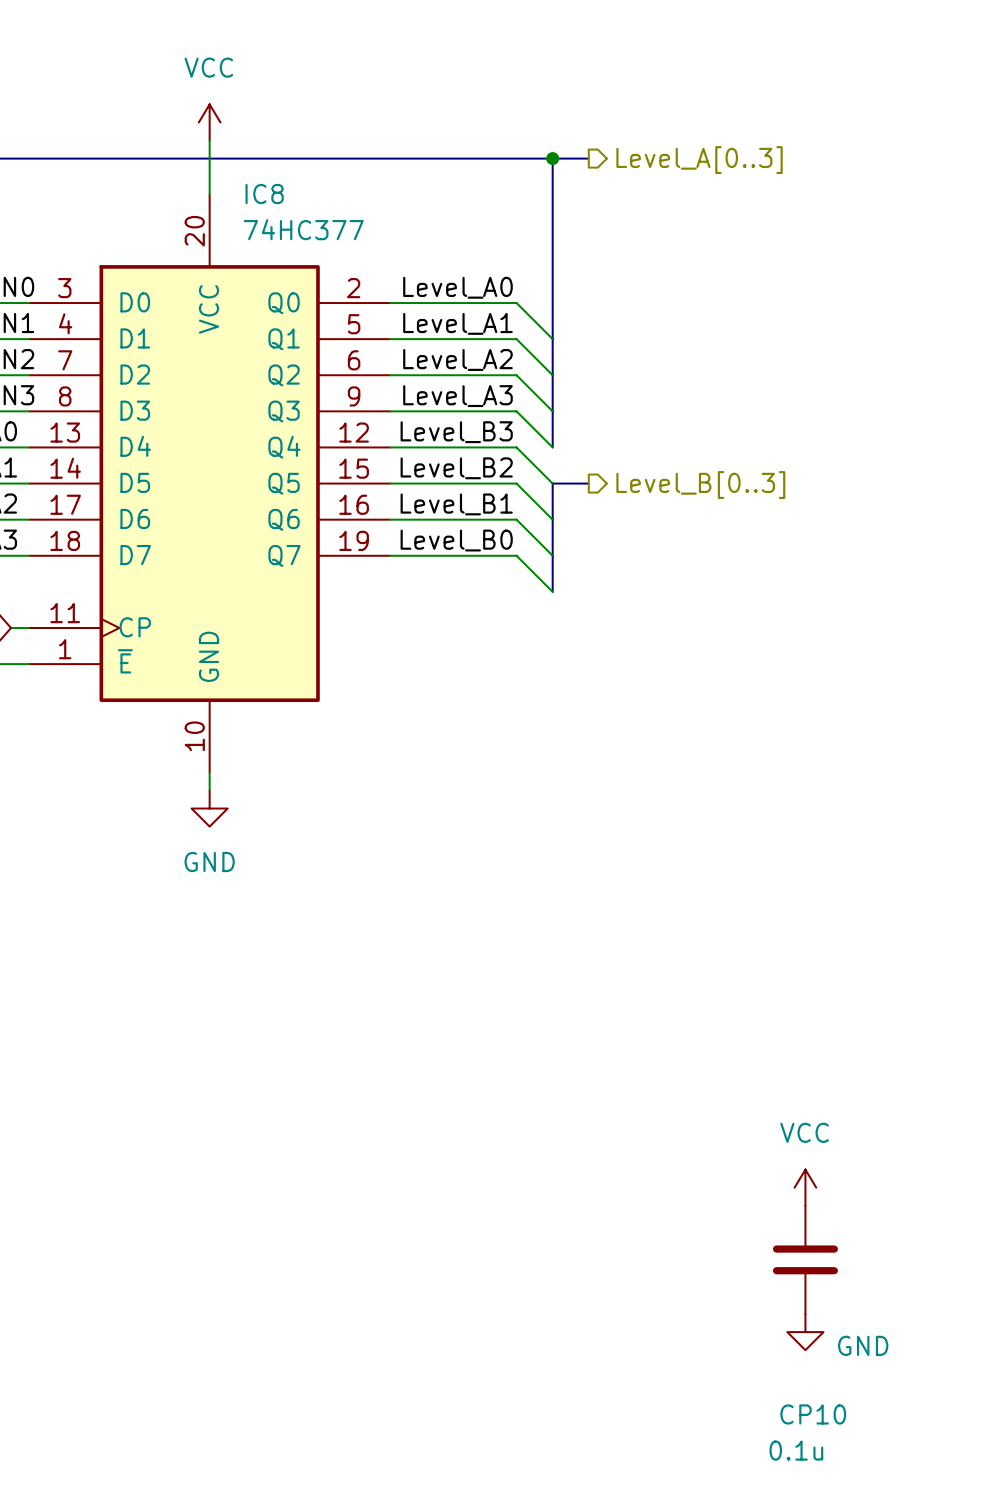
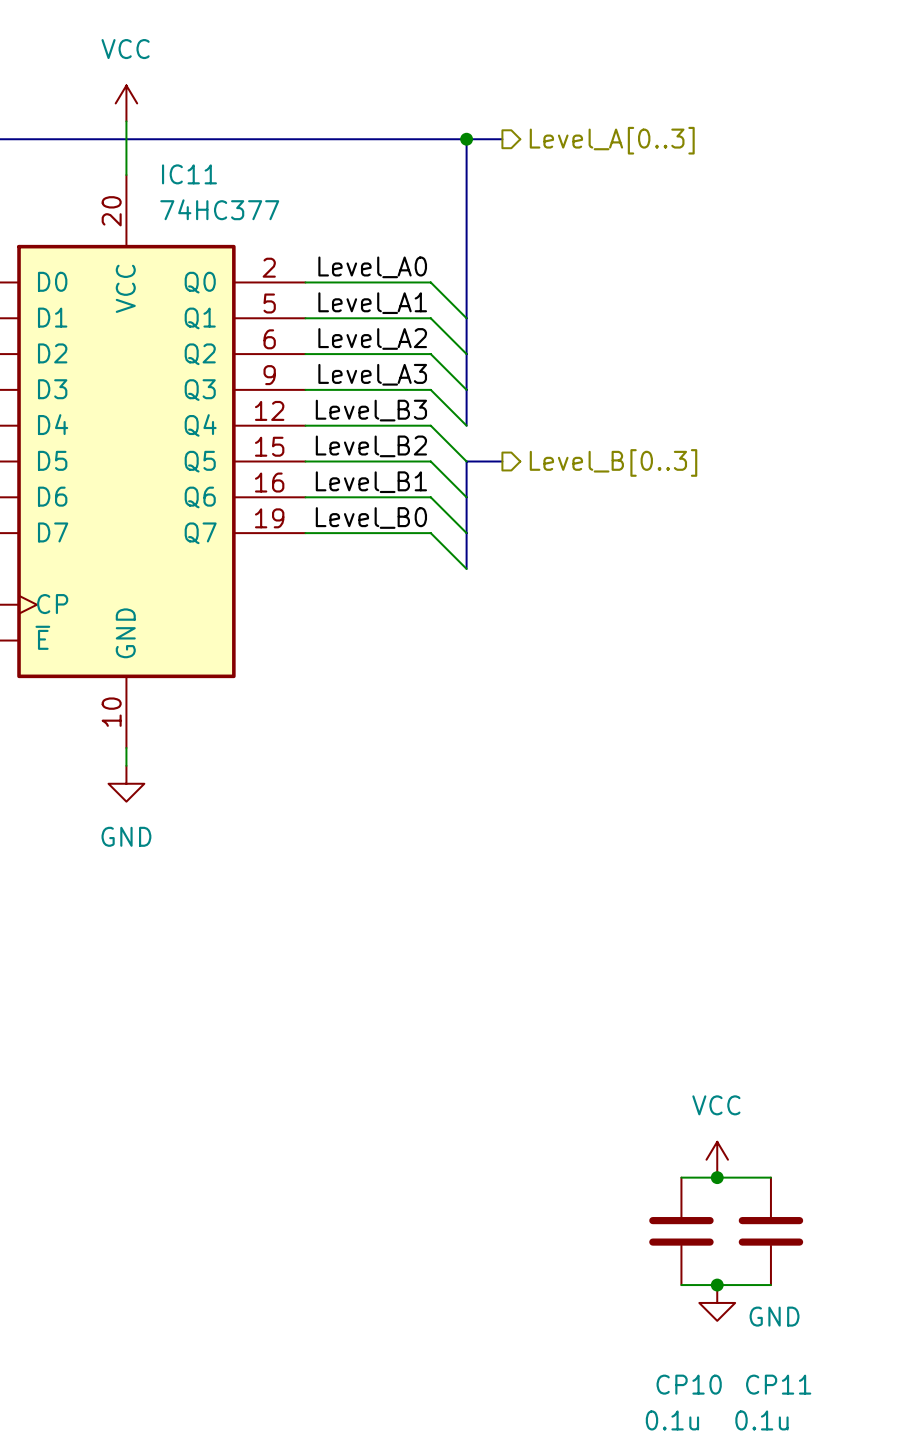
IC8 name: IC8 (264, 194) -> IC11 (189, 174)
wire: none -> (681, 1177) (770, 1177)
junction: none -> (717, 1177)
CP10 position: (805, 1259) -> (681, 1231)
CP11: none -> 0.1u (770, 1231)
wire: none -> (681, 1285) (770, 1285)
junction: none -> (717, 1285)

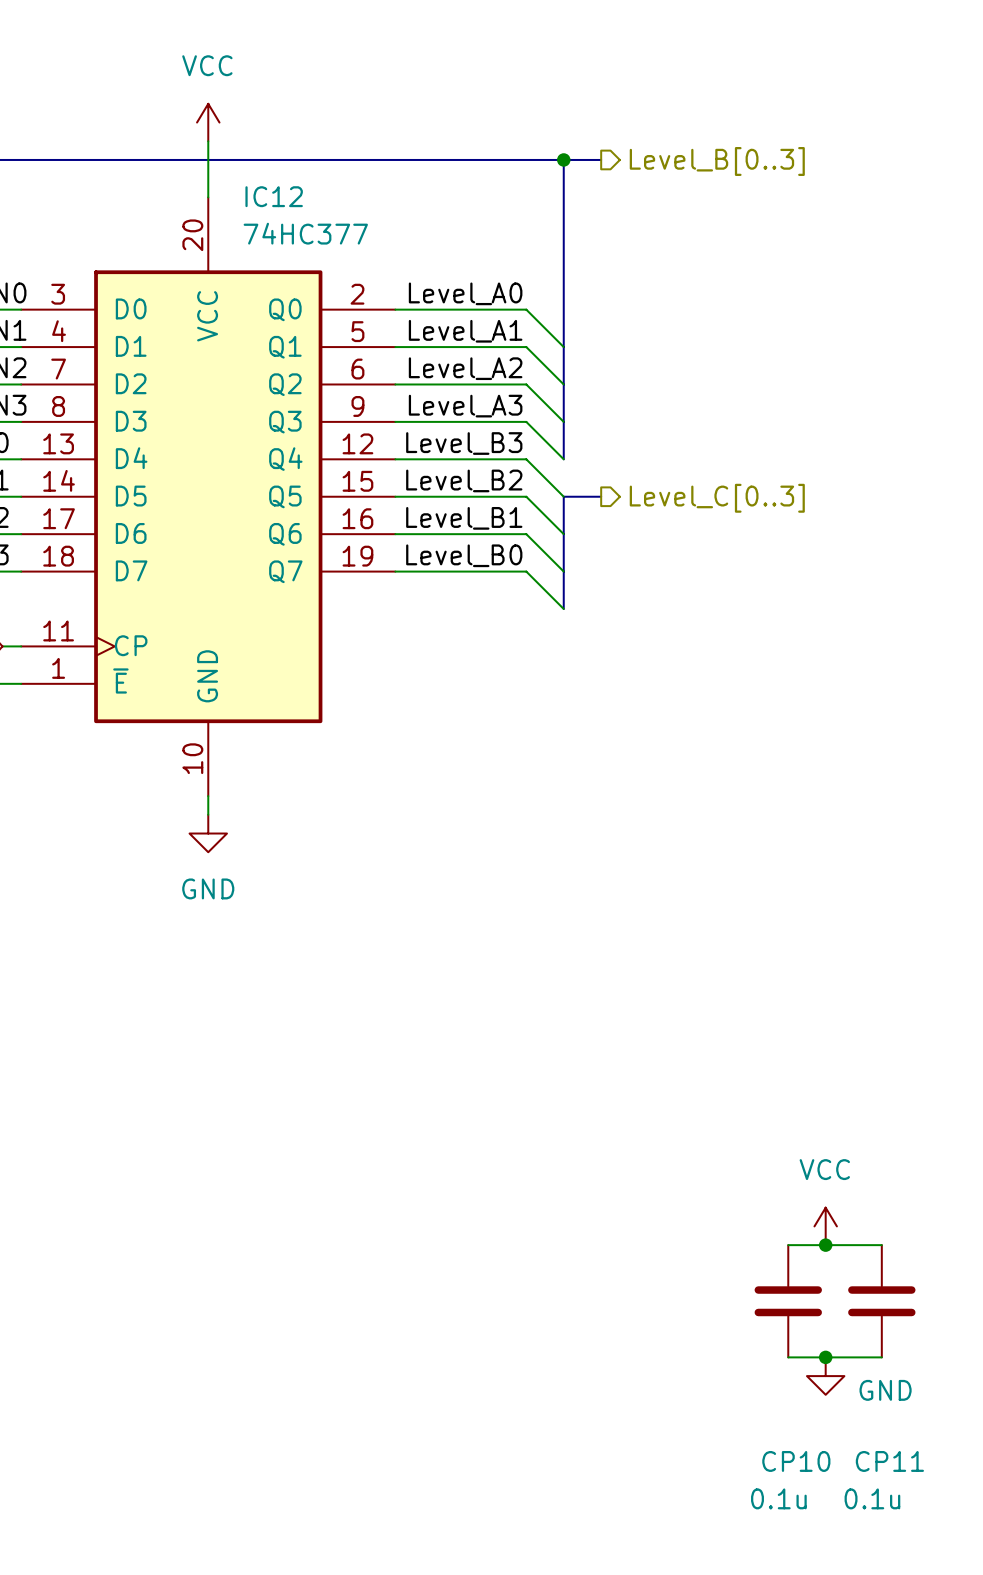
hierarchical label: Level_A[0..3] (612, 140) -> Level_B[0..3] (717, 161)
IC11 name: IC11 (189, 174) -> IC12 (274, 196)
hierarchical label: Level_B[0..3] (613, 462) -> Level_C[0..3] (717, 498)

